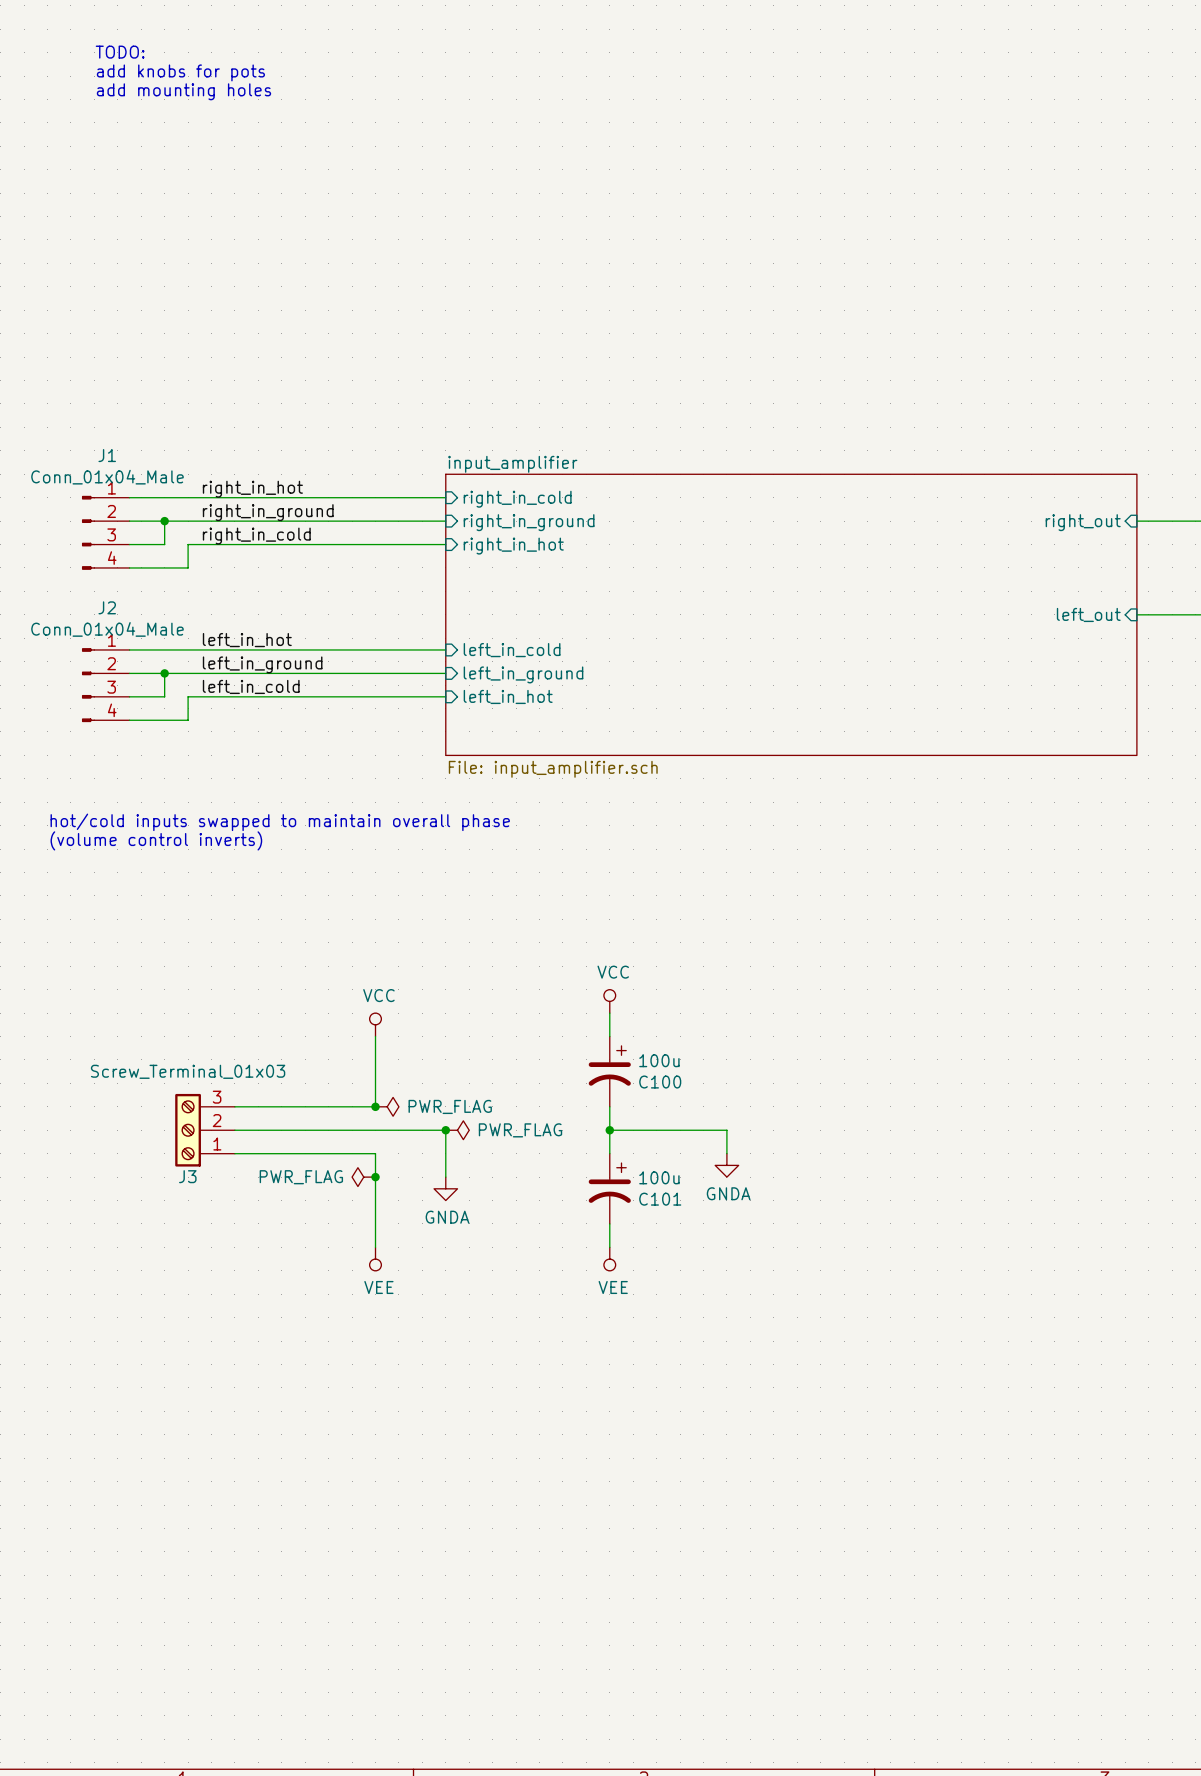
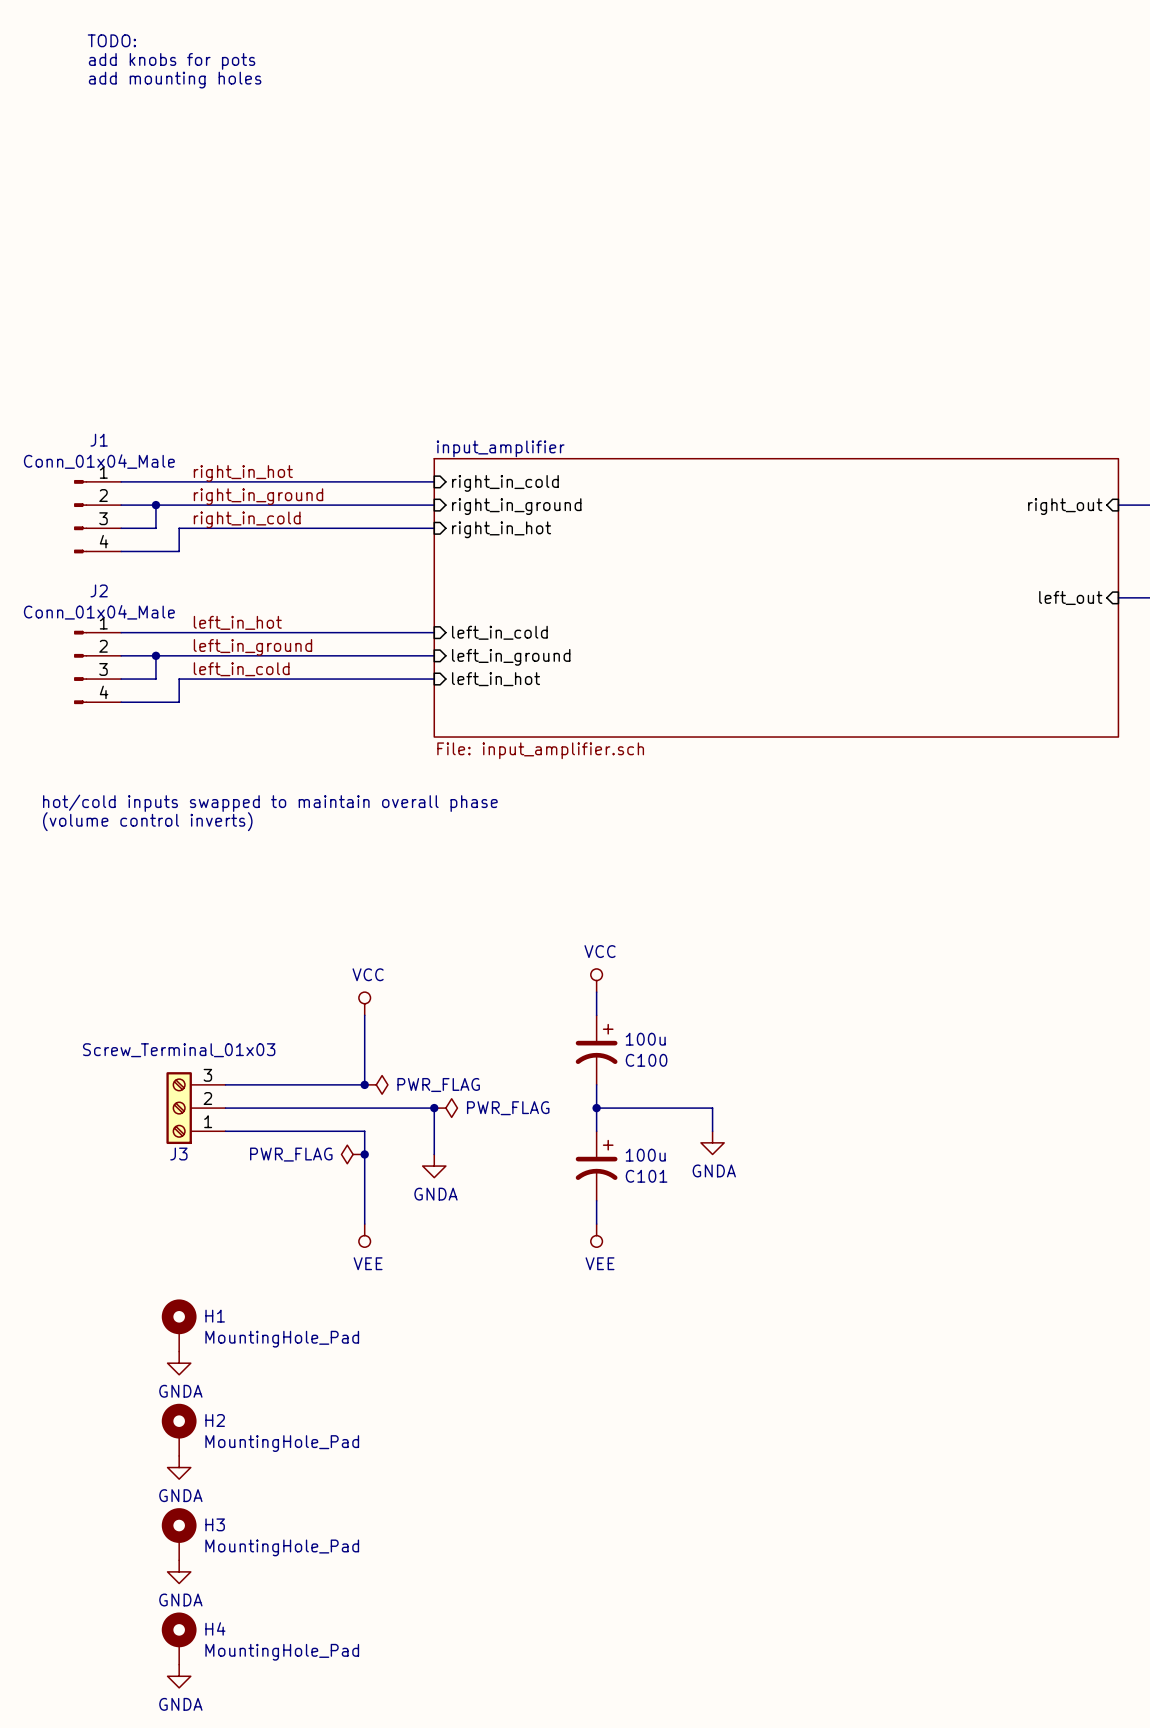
H1: none -> MountingHole_Pad (179, 1325)
power symbol: none -> GNDA (179, 1363)
H2: none -> MountingHole_Pad (179, 1429)
power symbol: none -> GNDA (179, 1467)
H3: none -> MountingHole_Pad (179, 1534)
power symbol: none -> GNDA (179, 1571)
H4: none -> MountingHole_Pad (179, 1638)
power symbol: none -> GNDA (179, 1676)

